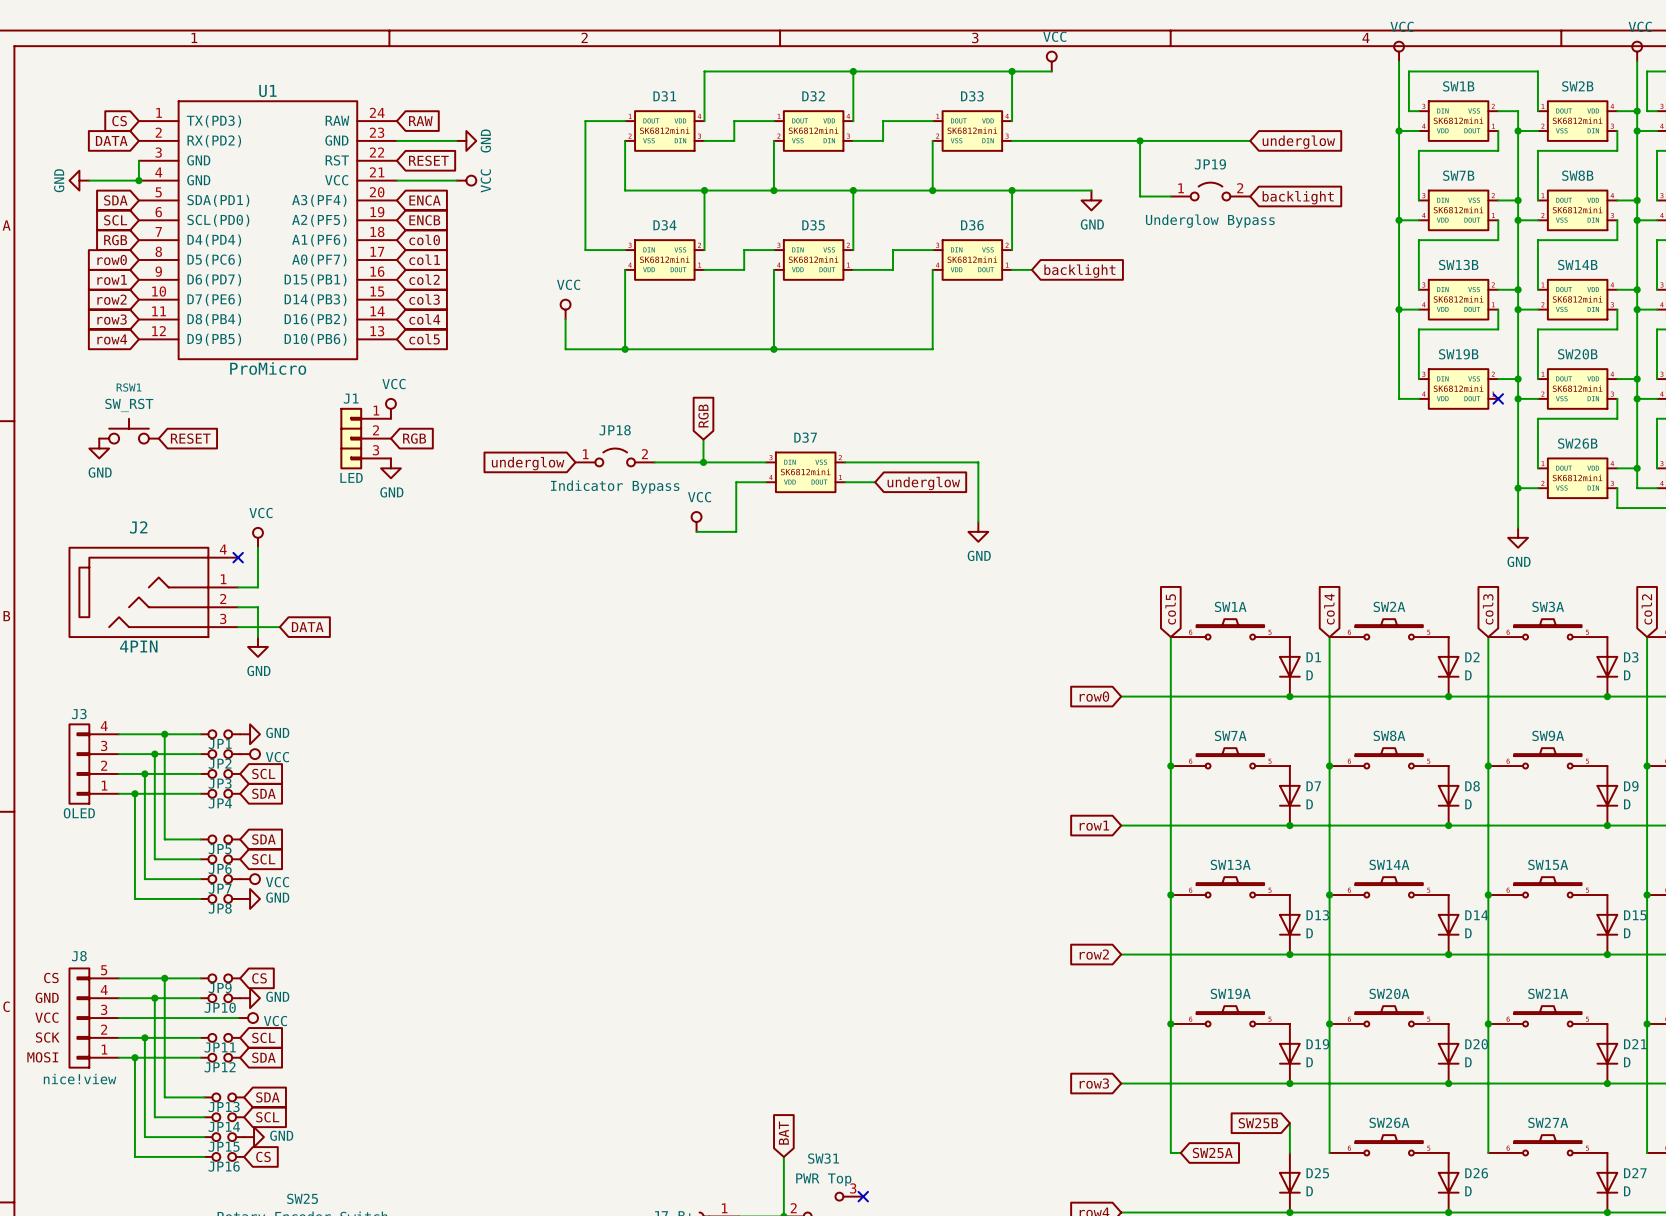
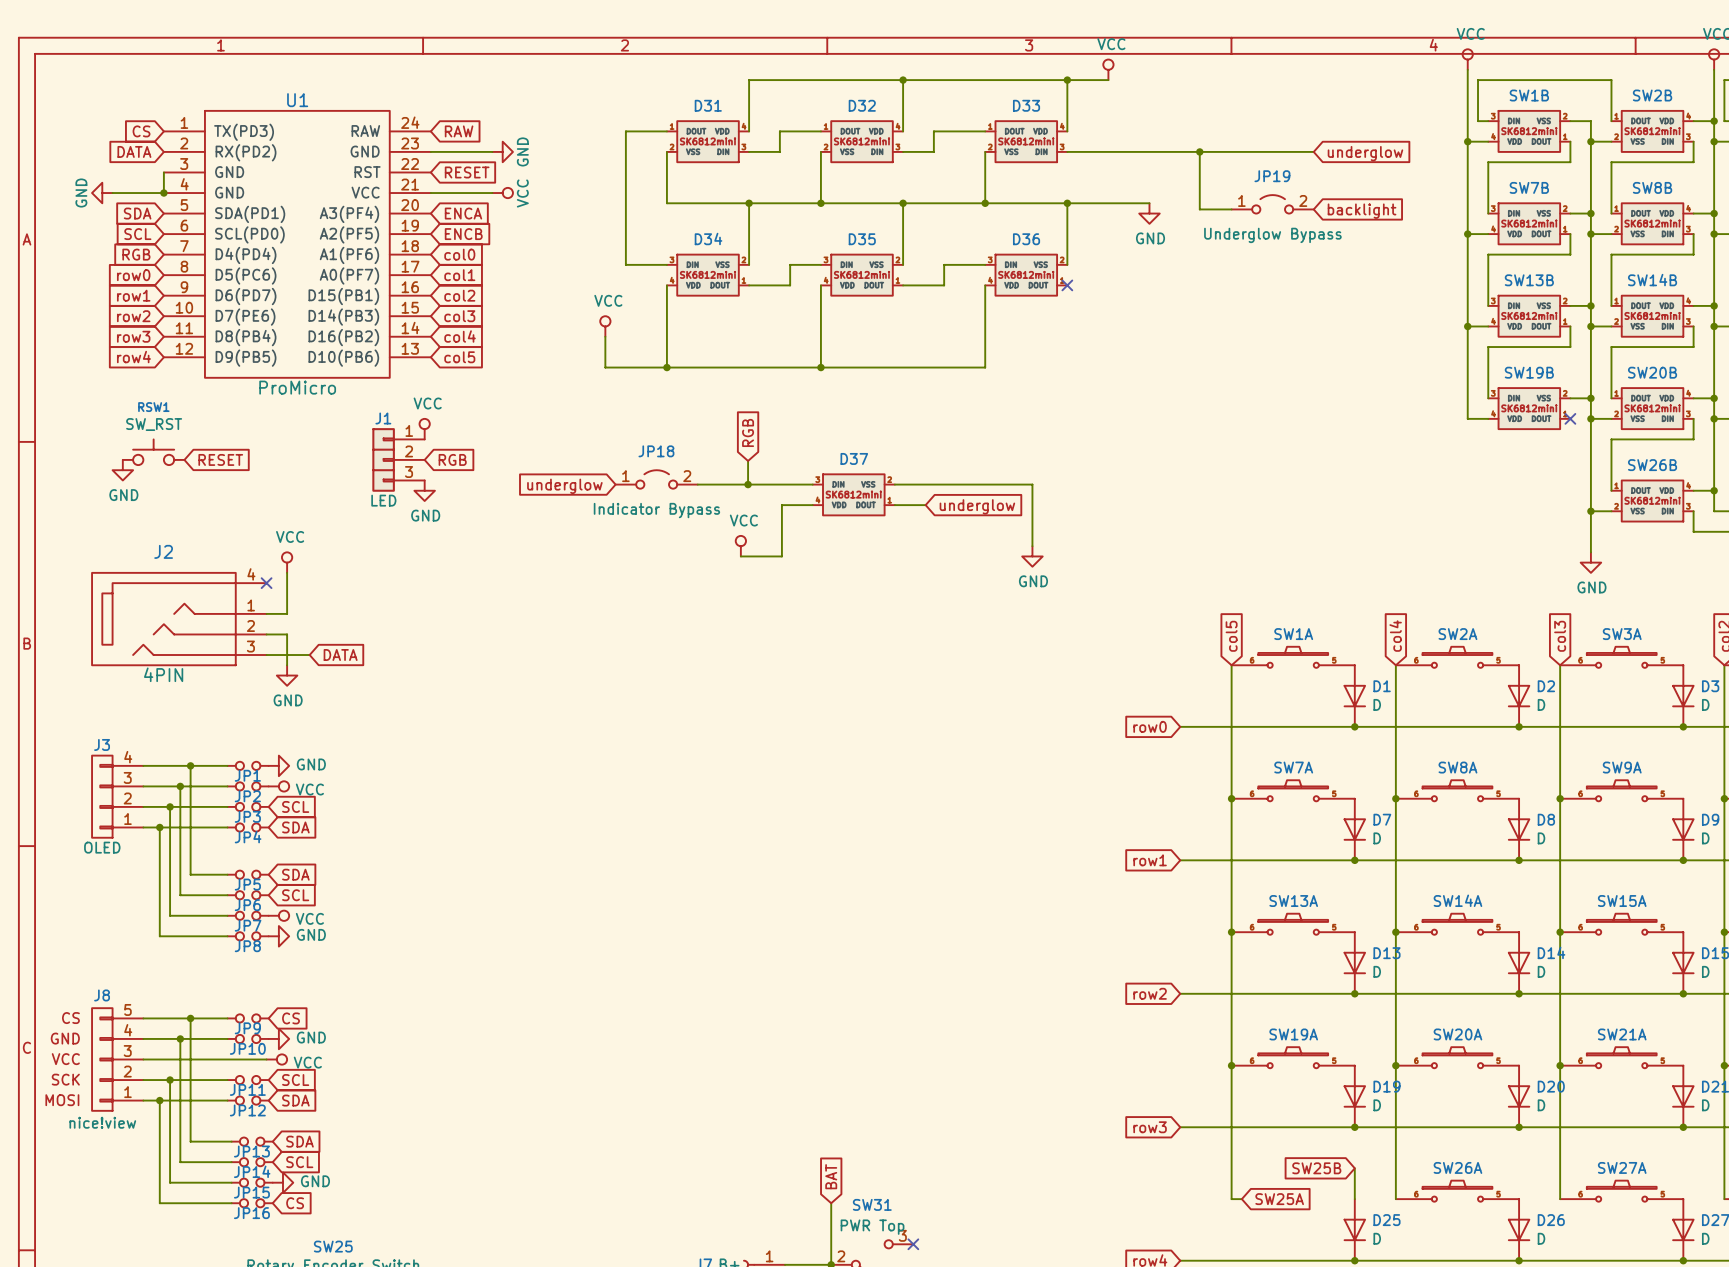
wire: (1012, 269) (1031, 269) -> none
no-connect mark: none -> (1067, 285)
global label: backlight (1079, 271) -> none

